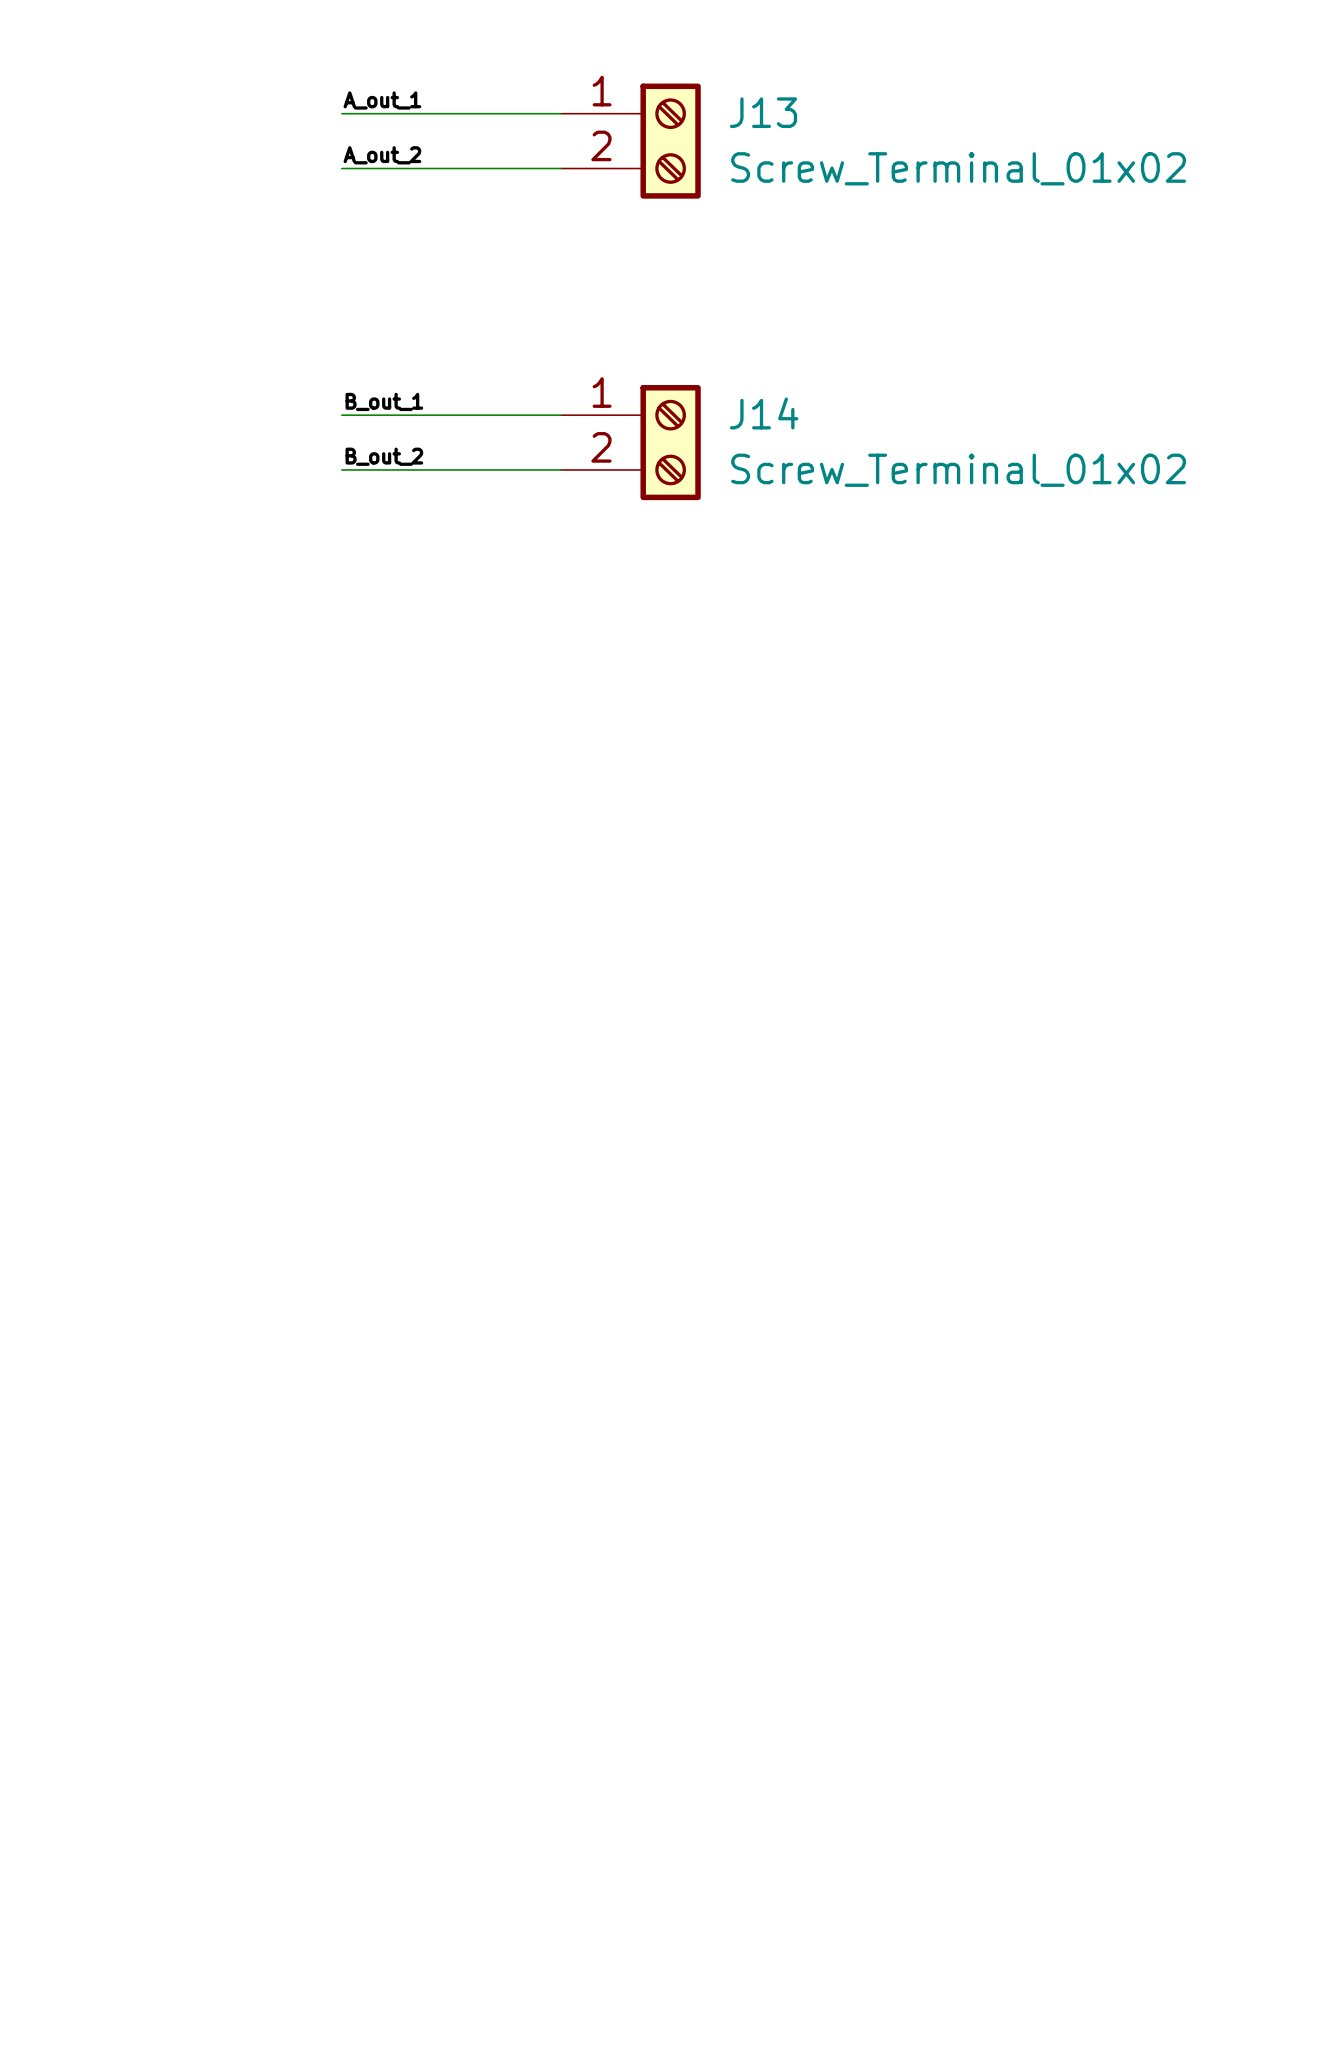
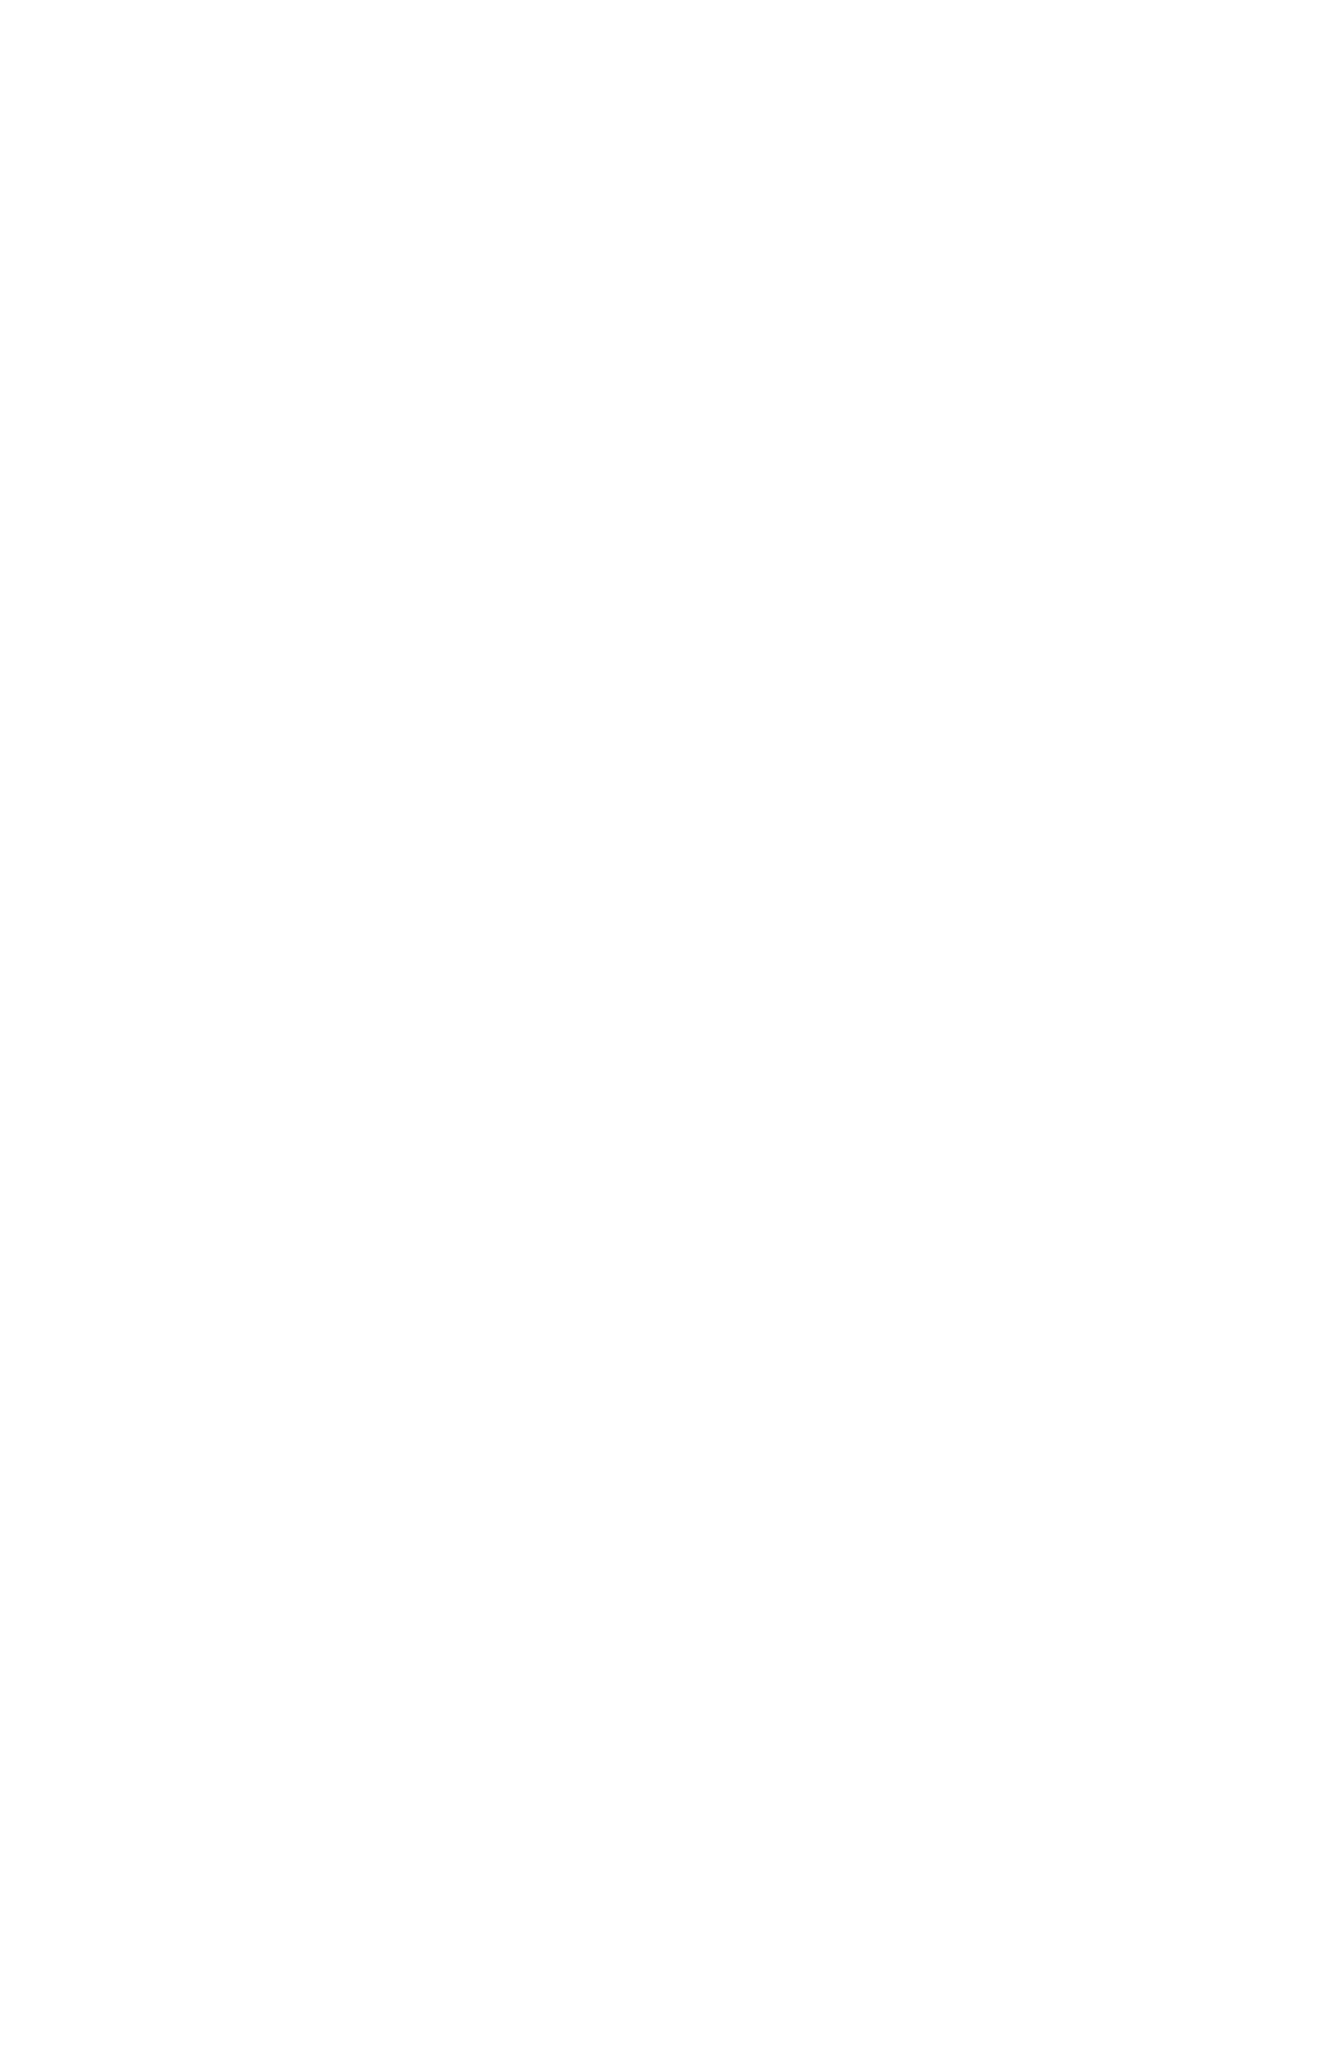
label: A_out_1 (382, 100) -> none
wire: (341, 113) (560, 113) -> none
J13: Screw_Terminal_01x02 (630, 141) -> none
label: A_out_2 (382, 155) -> none
wire: (341, 168) (560, 168) -> none
label: B_out_1 (384, 401) -> none
wire: (341, 415) (560, 415) -> none
J14: Screw_Terminal_01x02 (630, 442) -> none
label: B_out_2 (384, 456) -> none
wire: (341, 469) (560, 469) -> none

